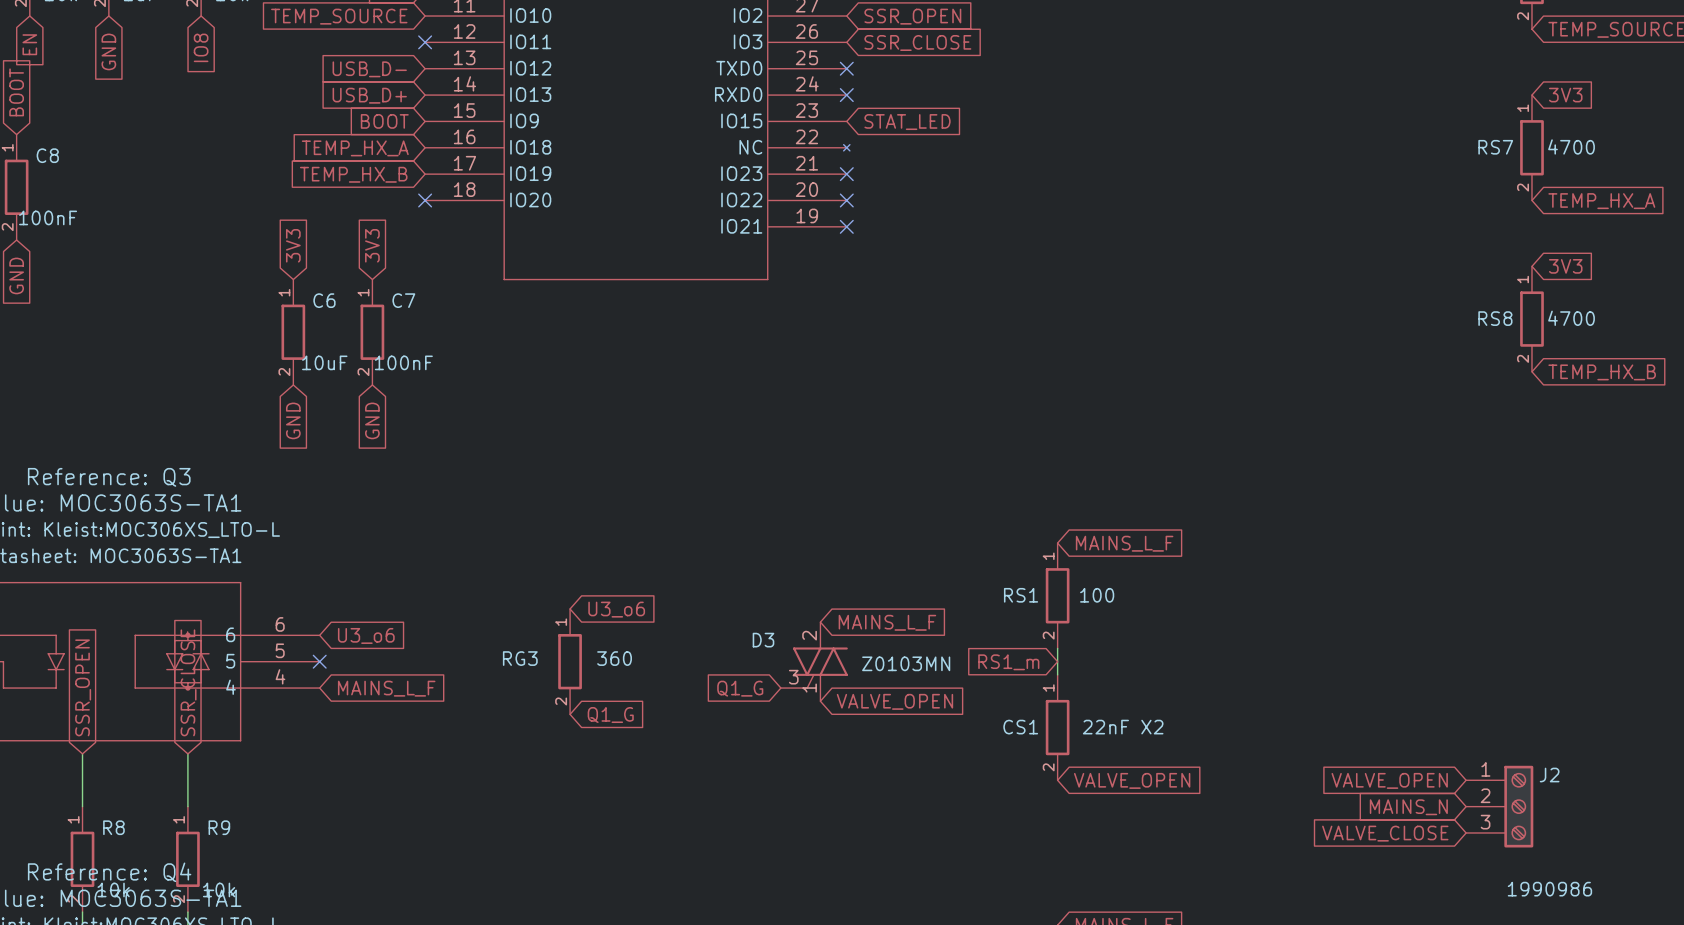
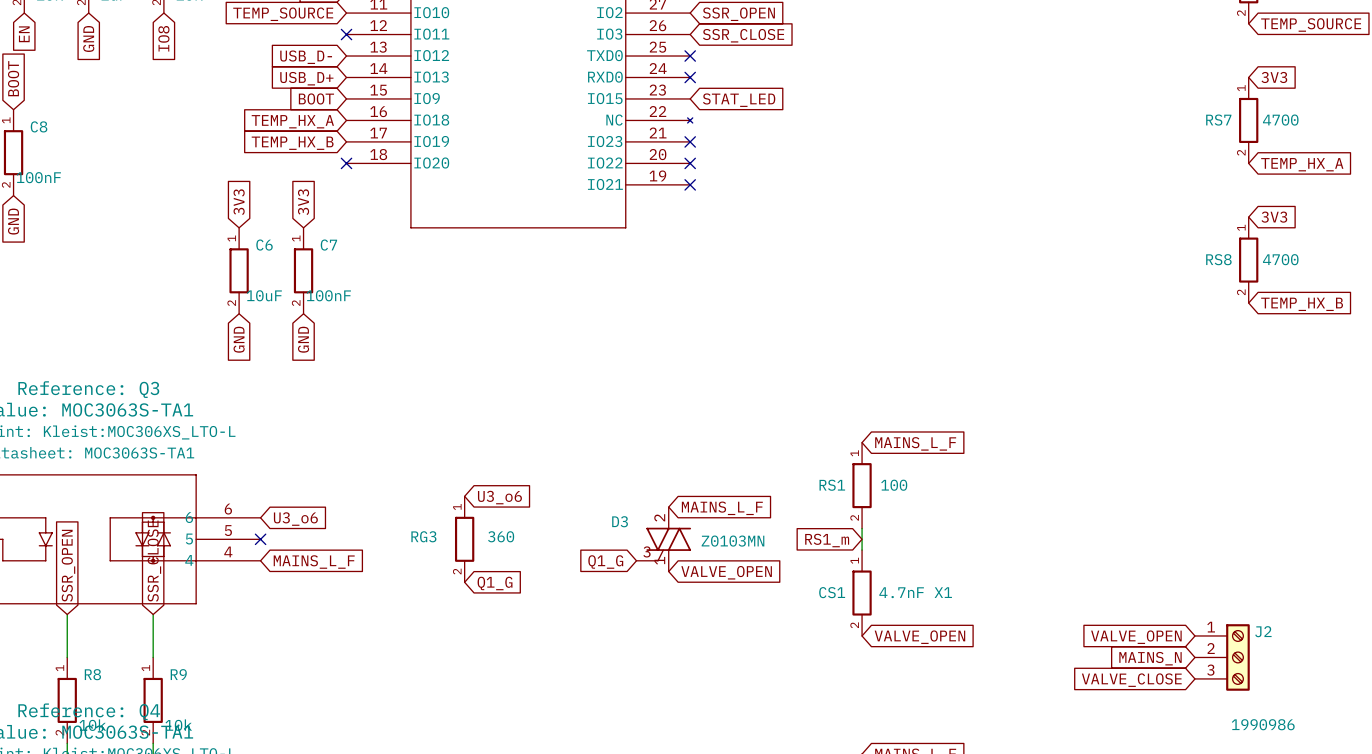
CS1 value: 22nF X2 (1123, 727) -> 4.7nF X1 (915, 592)

